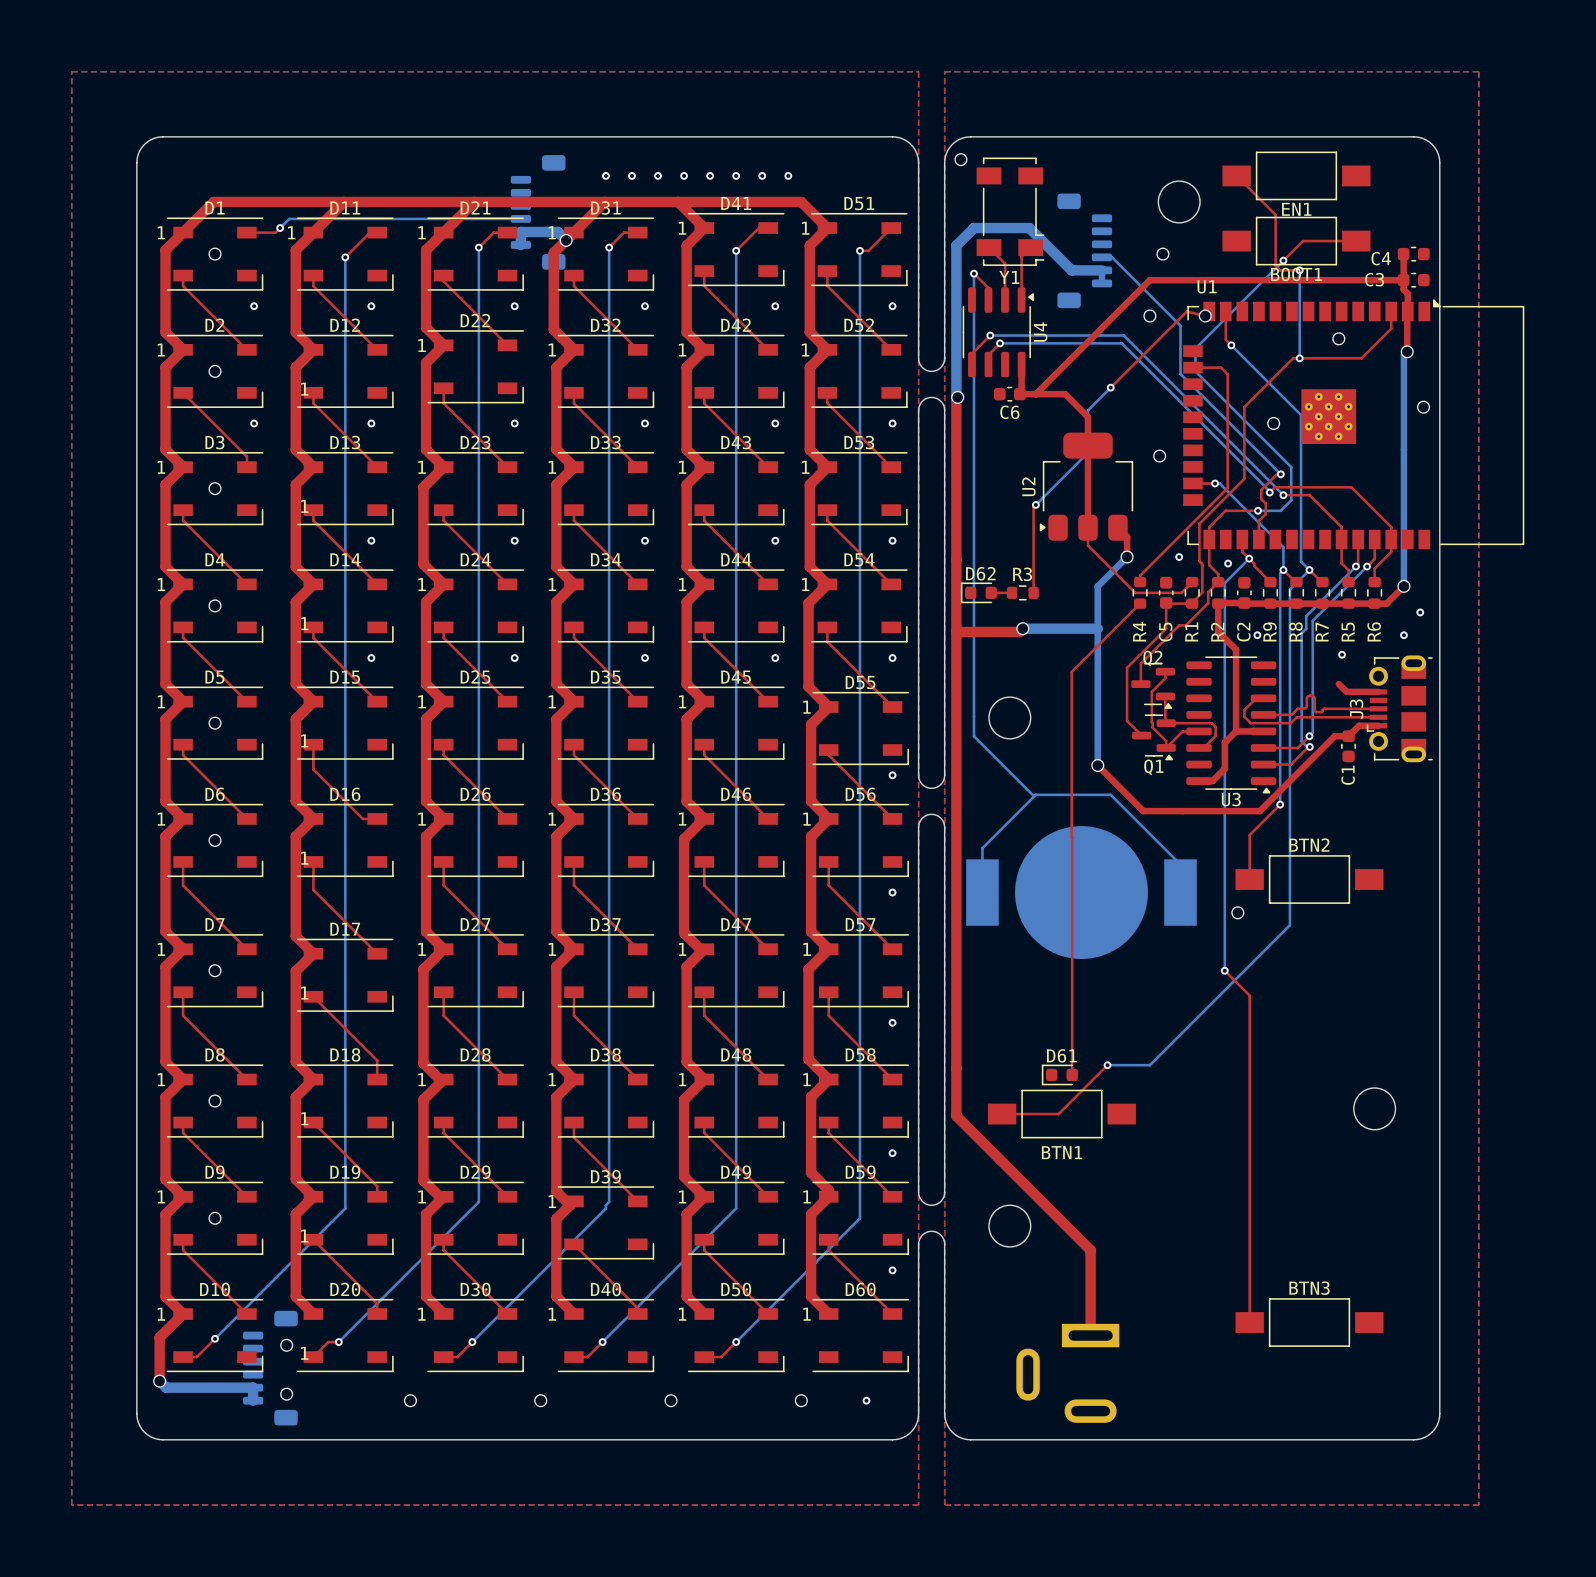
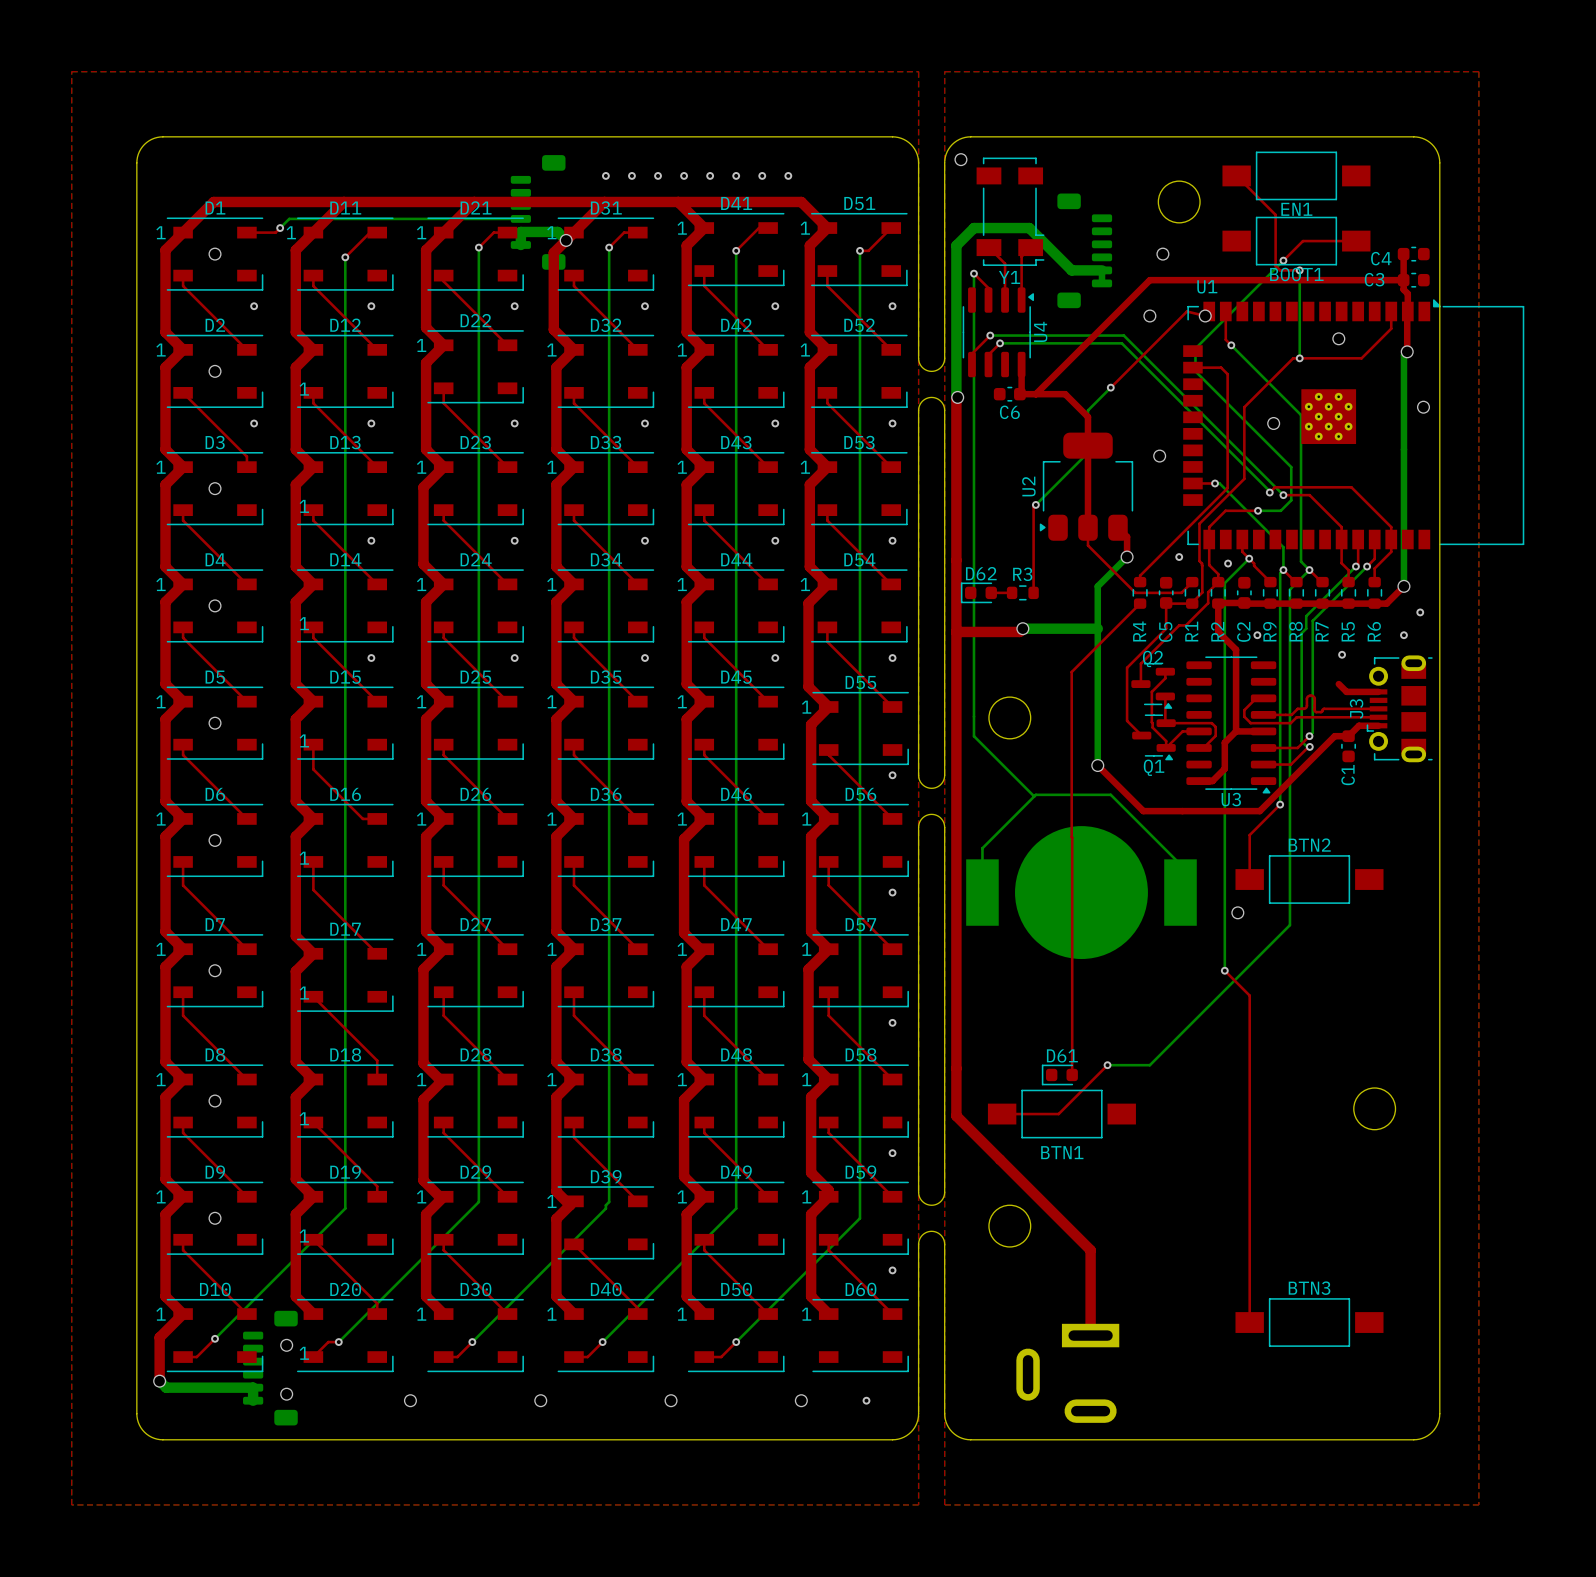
bottom track: (1102, 257) (1112, 257) (1180, 325) (1180, 373) (1280, 474) -> none
top track: (1280, 474) (1276, 474) (1261, 489) (1261, 499) (1265, 503) (1265, 514) (1258, 520) (1258, 539) -> none
via: (1280, 474) -> none

